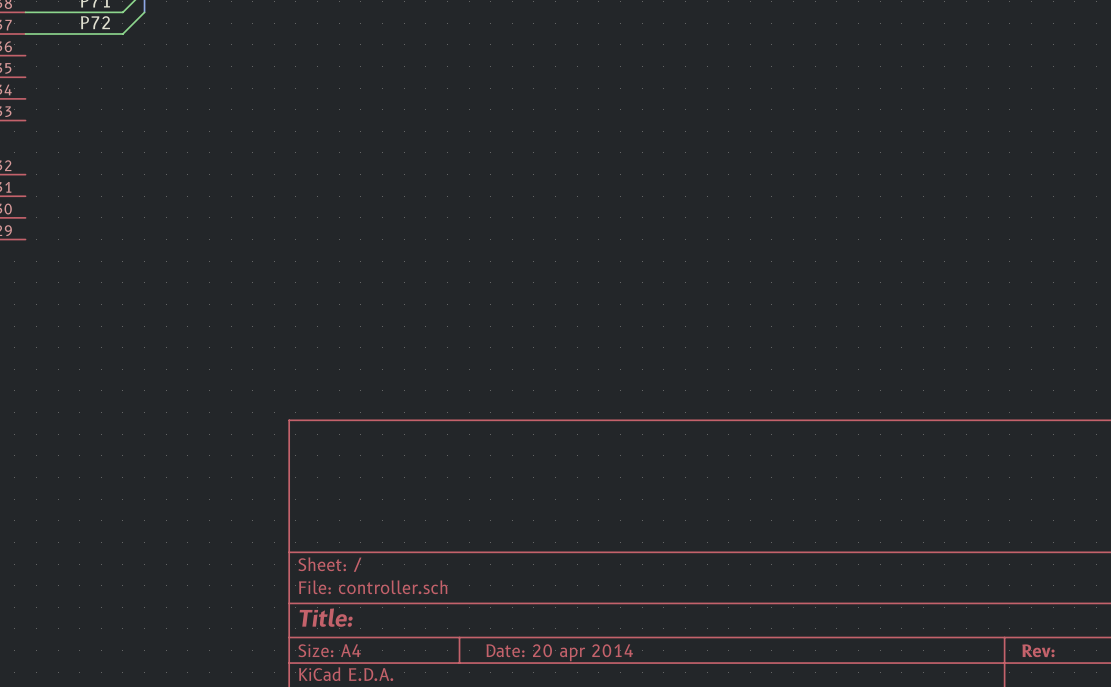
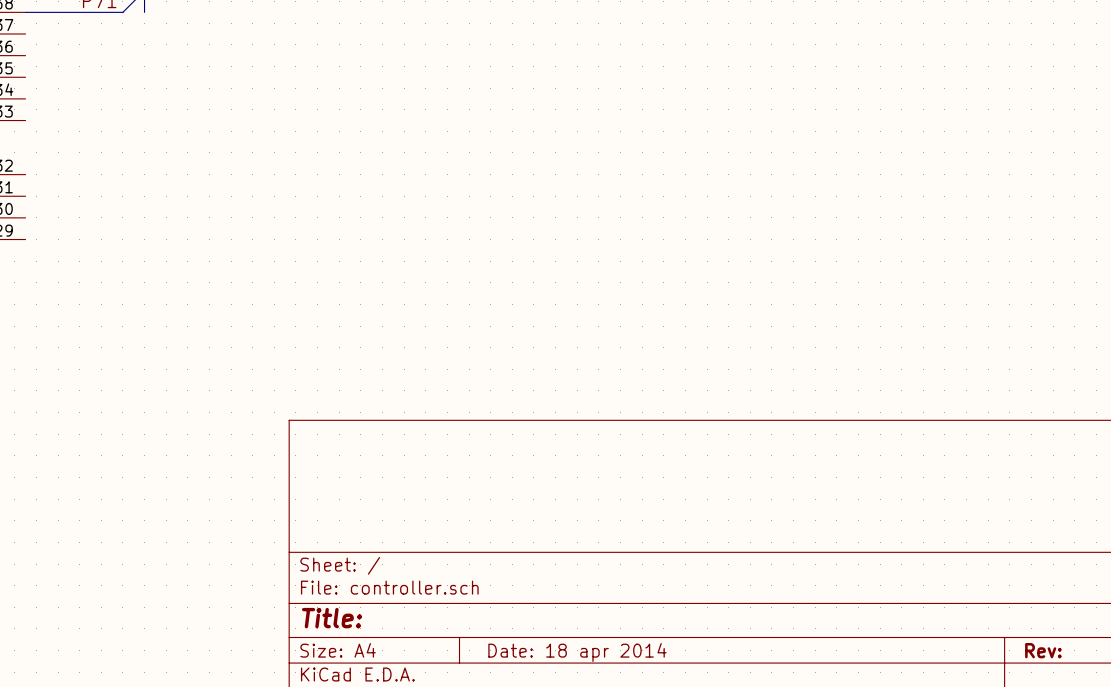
wire: (144, 12) (122, 34) (25, 34) -> none
label: P72 (95, 22) -> none
title block: Date: 20 apr 2014 (559, 652) -> Date: 18 apr 2014 (577, 652)

